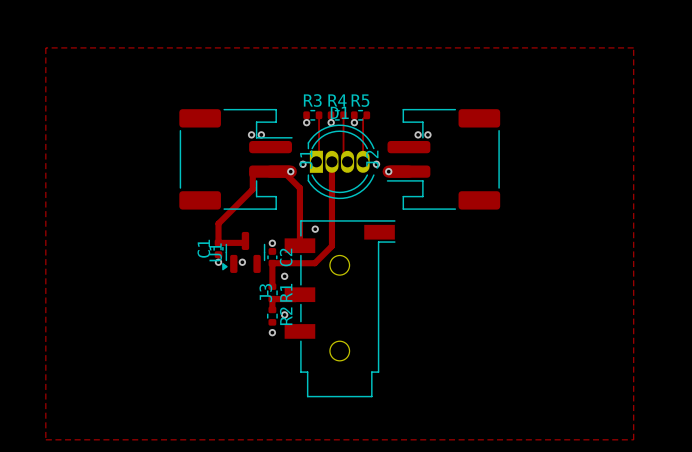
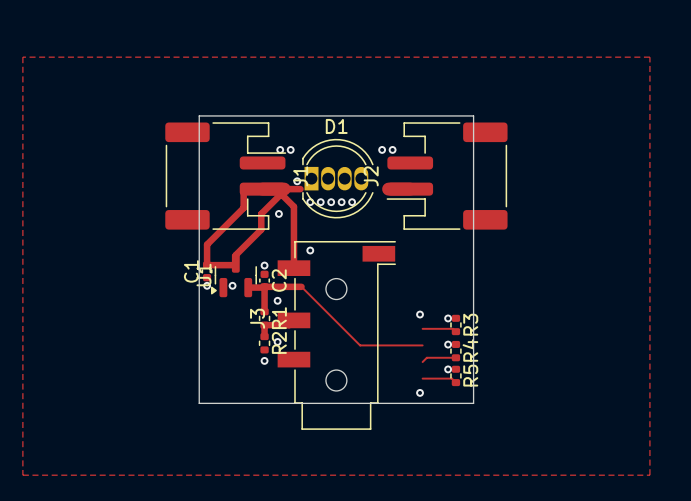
board edge: none -> (199, 115) (473, 115) (473, 403) (199, 403) (199, 115)
R3 rotation: 0° (312, 115) -> 90° clockwise (455, 324)
R3 position: (312, 115) -> (455, 324)
track: (319, 115) (319, 159) (316, 161) -> none
R4 rotation: 0° (337, 115) -> 90° clockwise (455, 351)
R4 position: (337, 115) -> (455, 351)
track: (343, 115) (343, 157) (347, 161) -> none
R5 rotation: 0° (360, 115) -> 90° clockwise (455, 375)
R5 position: (360, 115) -> (455, 375)
track: (366, 115) (363, 119) (363, 161) -> none
via: (306, 122) -> none
via: (331, 122) -> none
via: (354, 122) -> none
via: (251, 134) -> none
via: (261, 134) -> none
via: none -> (280, 149)
via: none -> (290, 149)
via: none -> (382, 149)
via: none -> (392, 149)
via: (418, 134) -> none
via: (427, 134) -> none
track: (331, 161) (331, 246) (314, 263) (307, 263) -> (422, 345) (360, 345) (301, 286)
via: (376, 164) -> none
via: (290, 171) -> none
track: none -> (300, 189) (286, 189) (261, 213) (261, 229) (235, 255) (235, 263)
via: (388, 171) -> none
via: none -> (310, 202)
via: none -> (320, 202)
via: none -> (331, 202)
via: none -> (341, 202)
via: none -> (352, 202)
via: none -> (278, 213)
track: none -> (264, 286) (248, 287)
via: none -> (420, 314)
via: none -> (448, 318)
track: none -> (422, 328) (453, 328) (455, 331)
via: none -> (448, 344)
track: none -> (455, 357) (426, 357) (422, 362)
via: none -> (448, 369)
track: none -> (422, 378) (451, 378) (455, 382)
via: none -> (420, 392)

